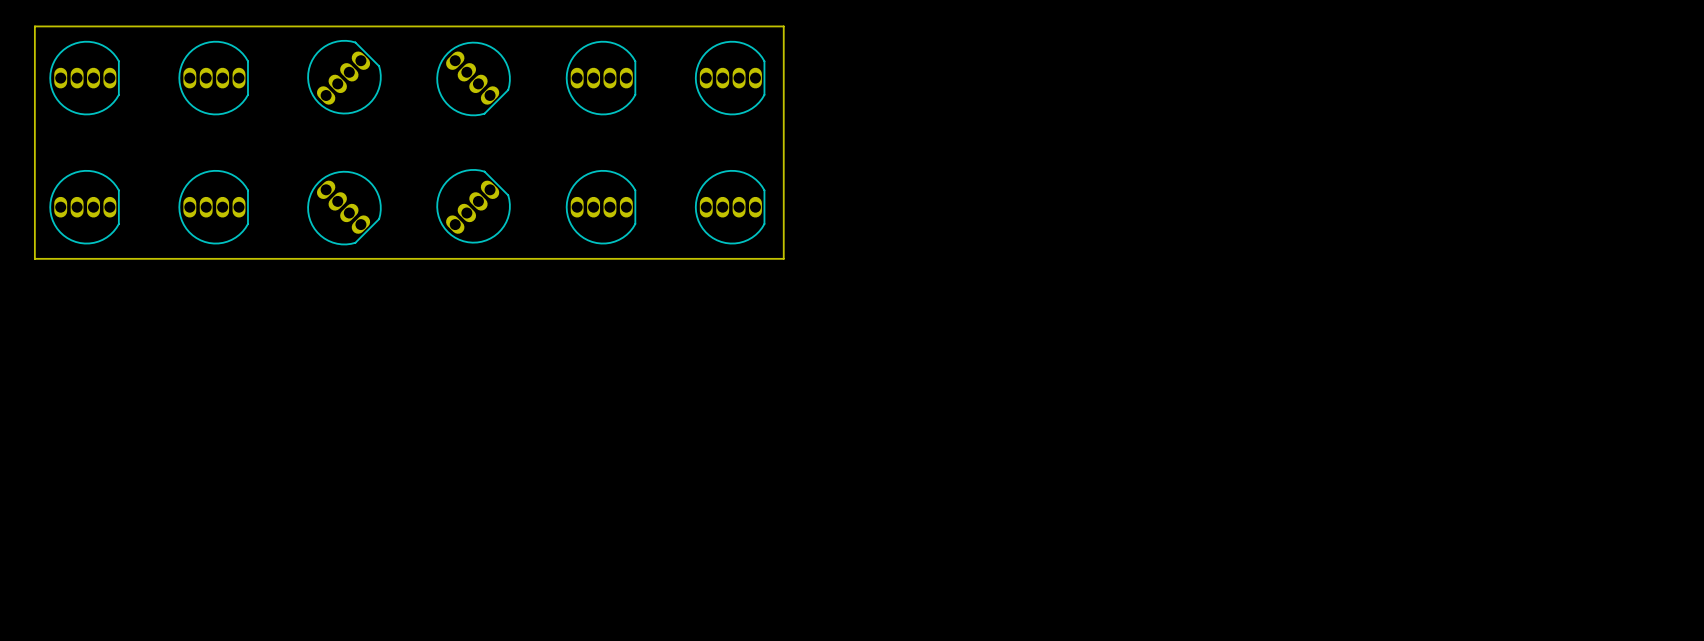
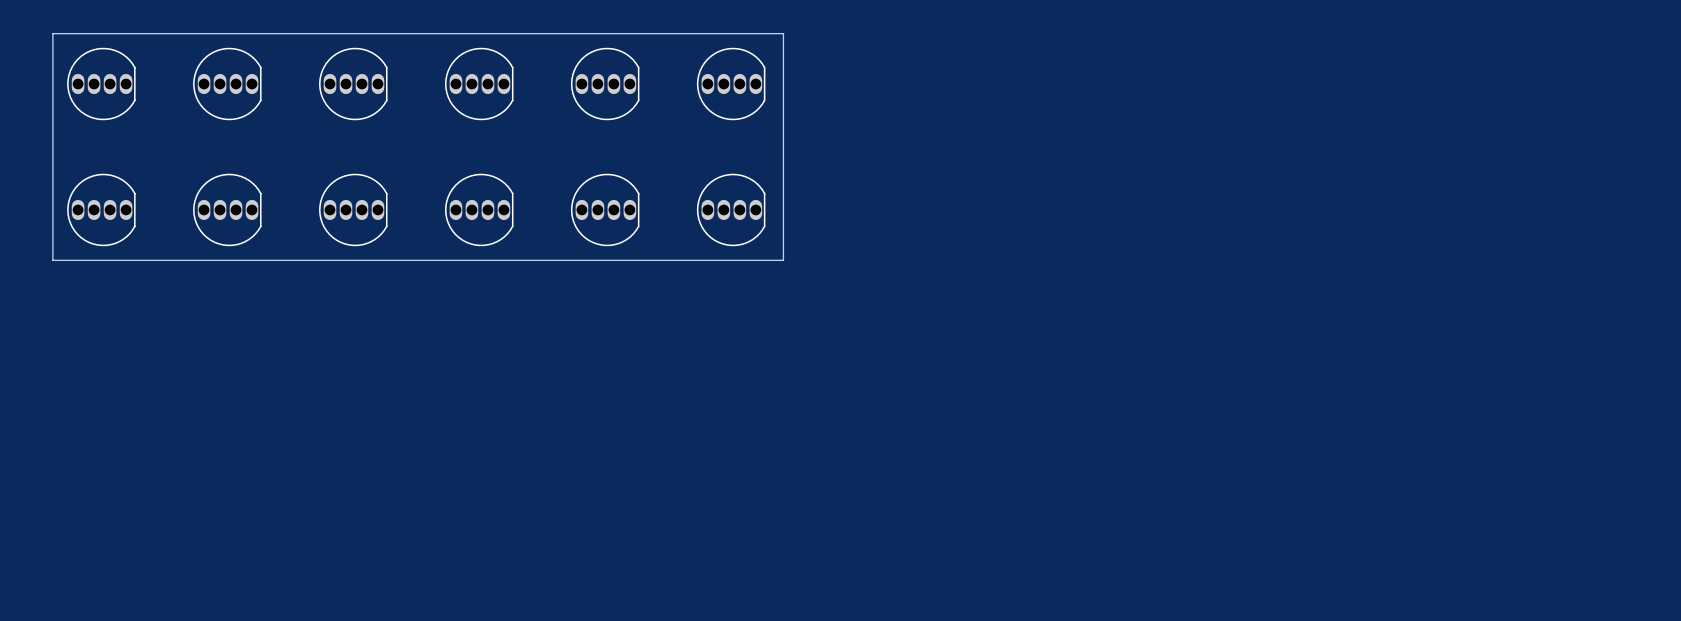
part rotation: 0° (344, 77) -> 45° clockwise (353, 84)
part rotation: 0° (473, 78) -> 45° counterclockwise (479, 84)
part rotation: 0° (473, 206) -> 45° clockwise (479, 209)
part rotation: 0° (344, 208) -> 45° counterclockwise (353, 209)

